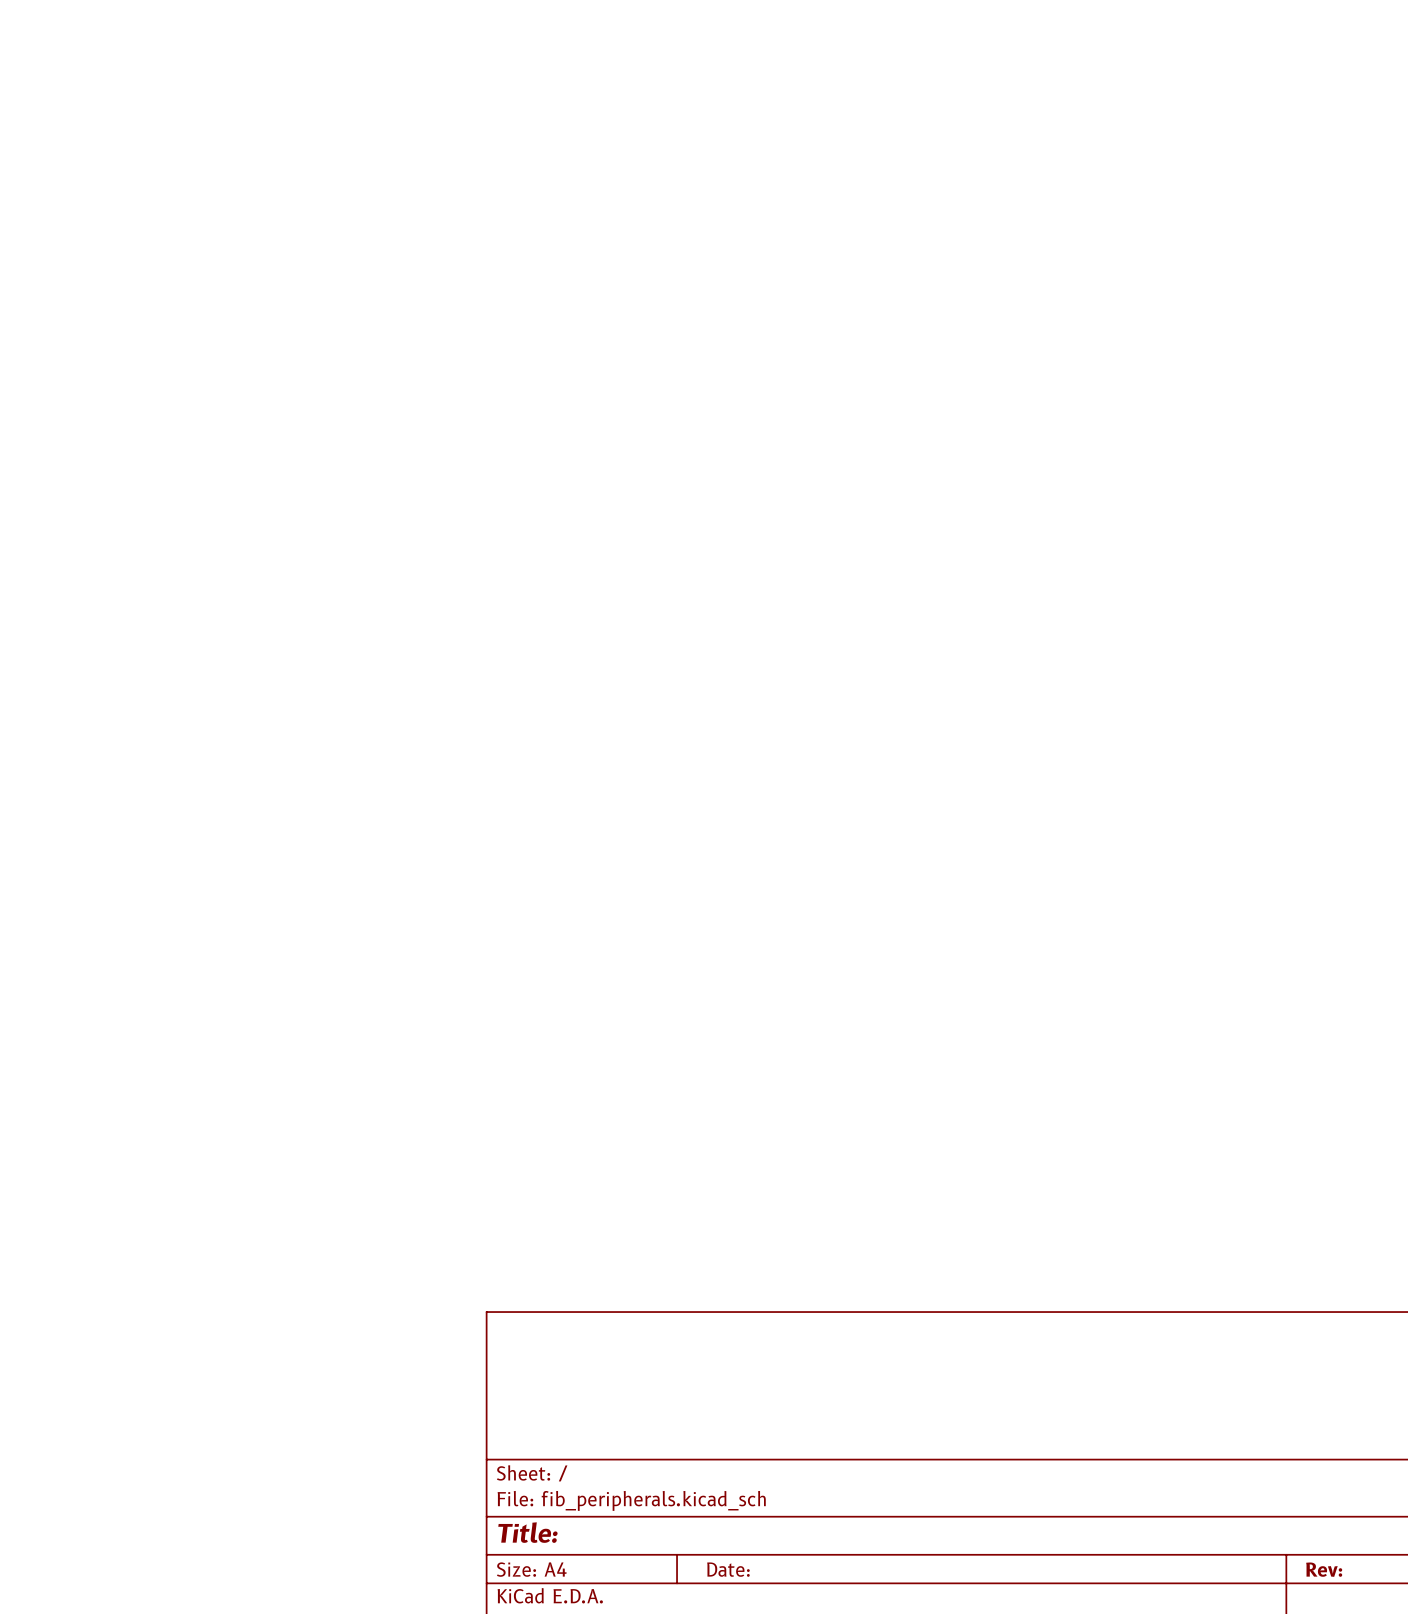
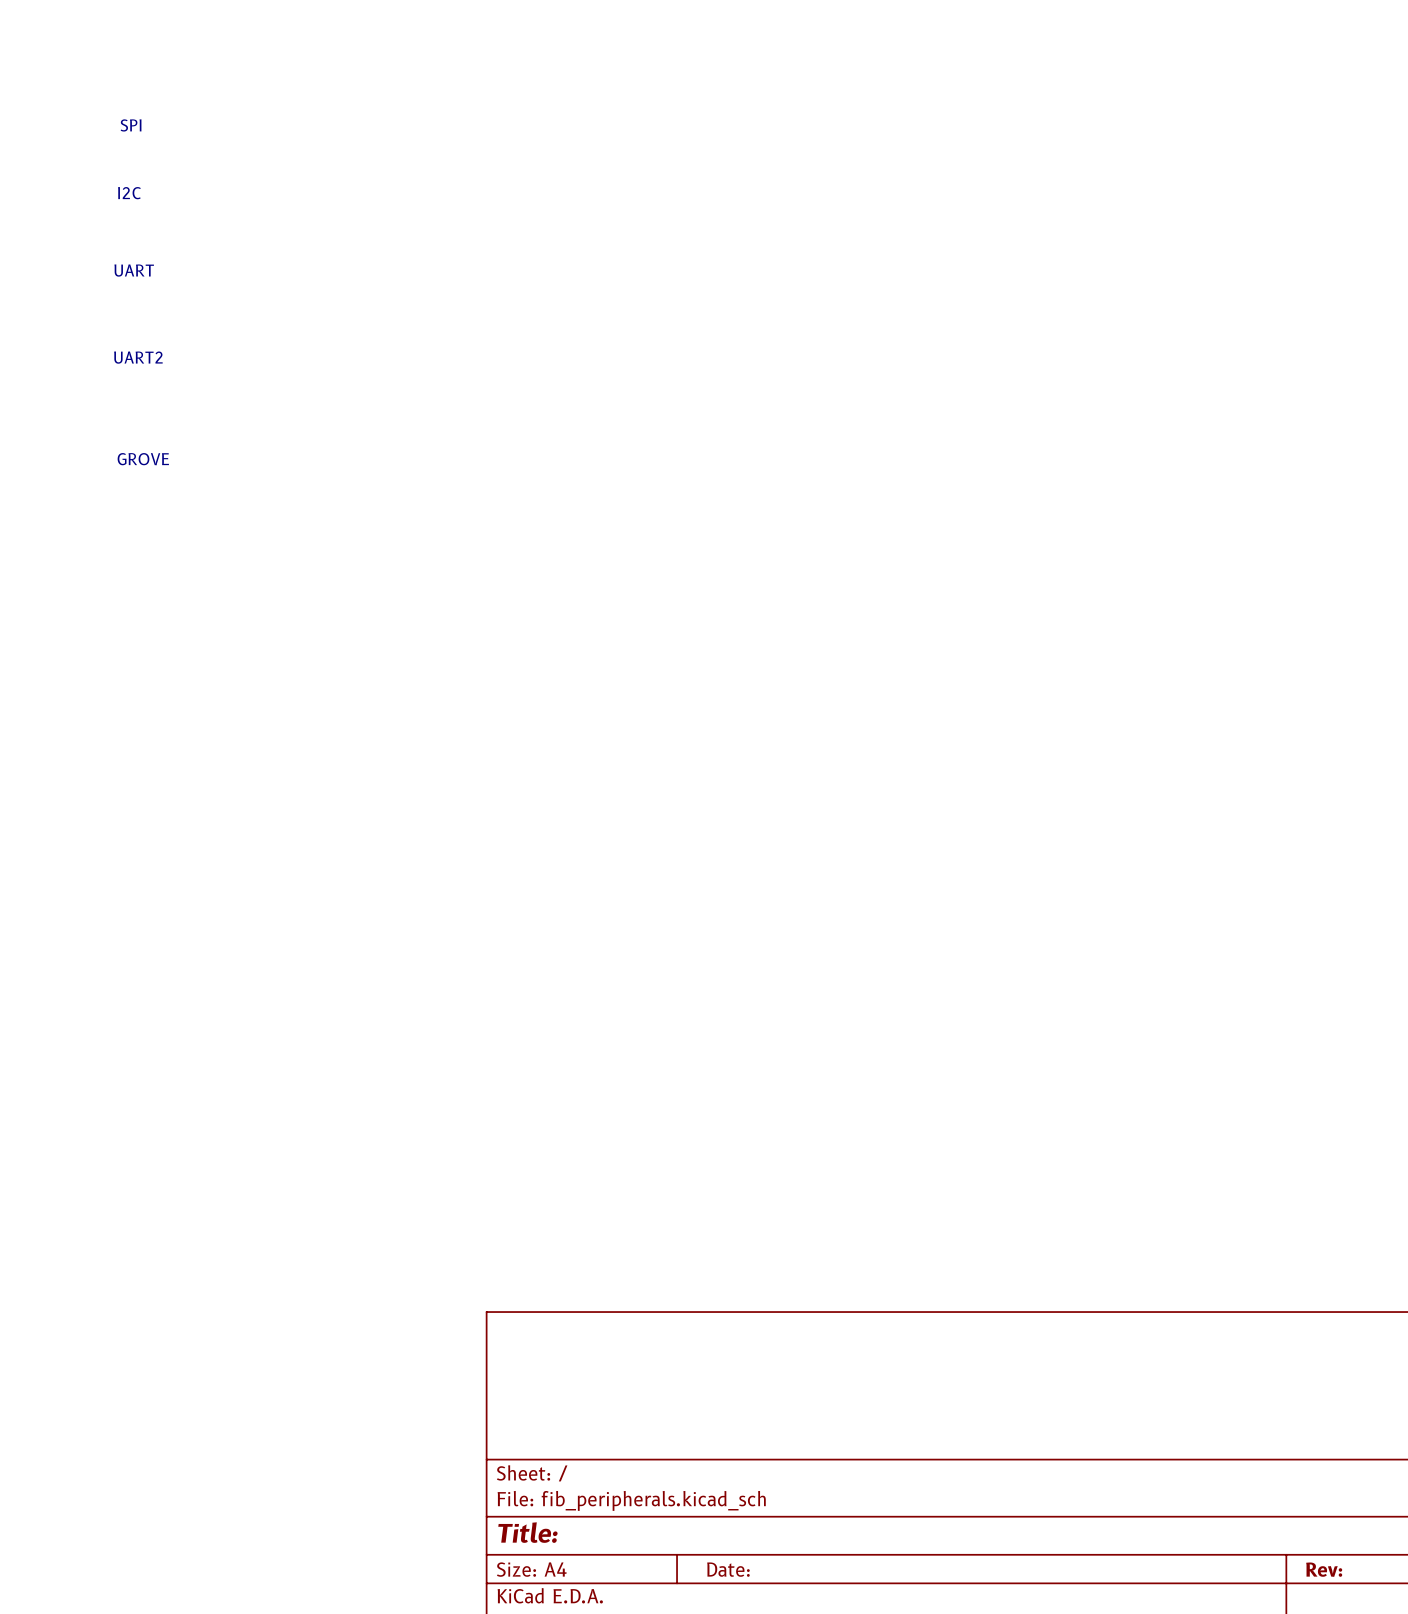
text: none -> SPI (131, 125)
text: none -> I2C (129, 193)
text: none -> UART (134, 270)
text: none -> UART2 (138, 357)
text: none -> GROVE (143, 459)

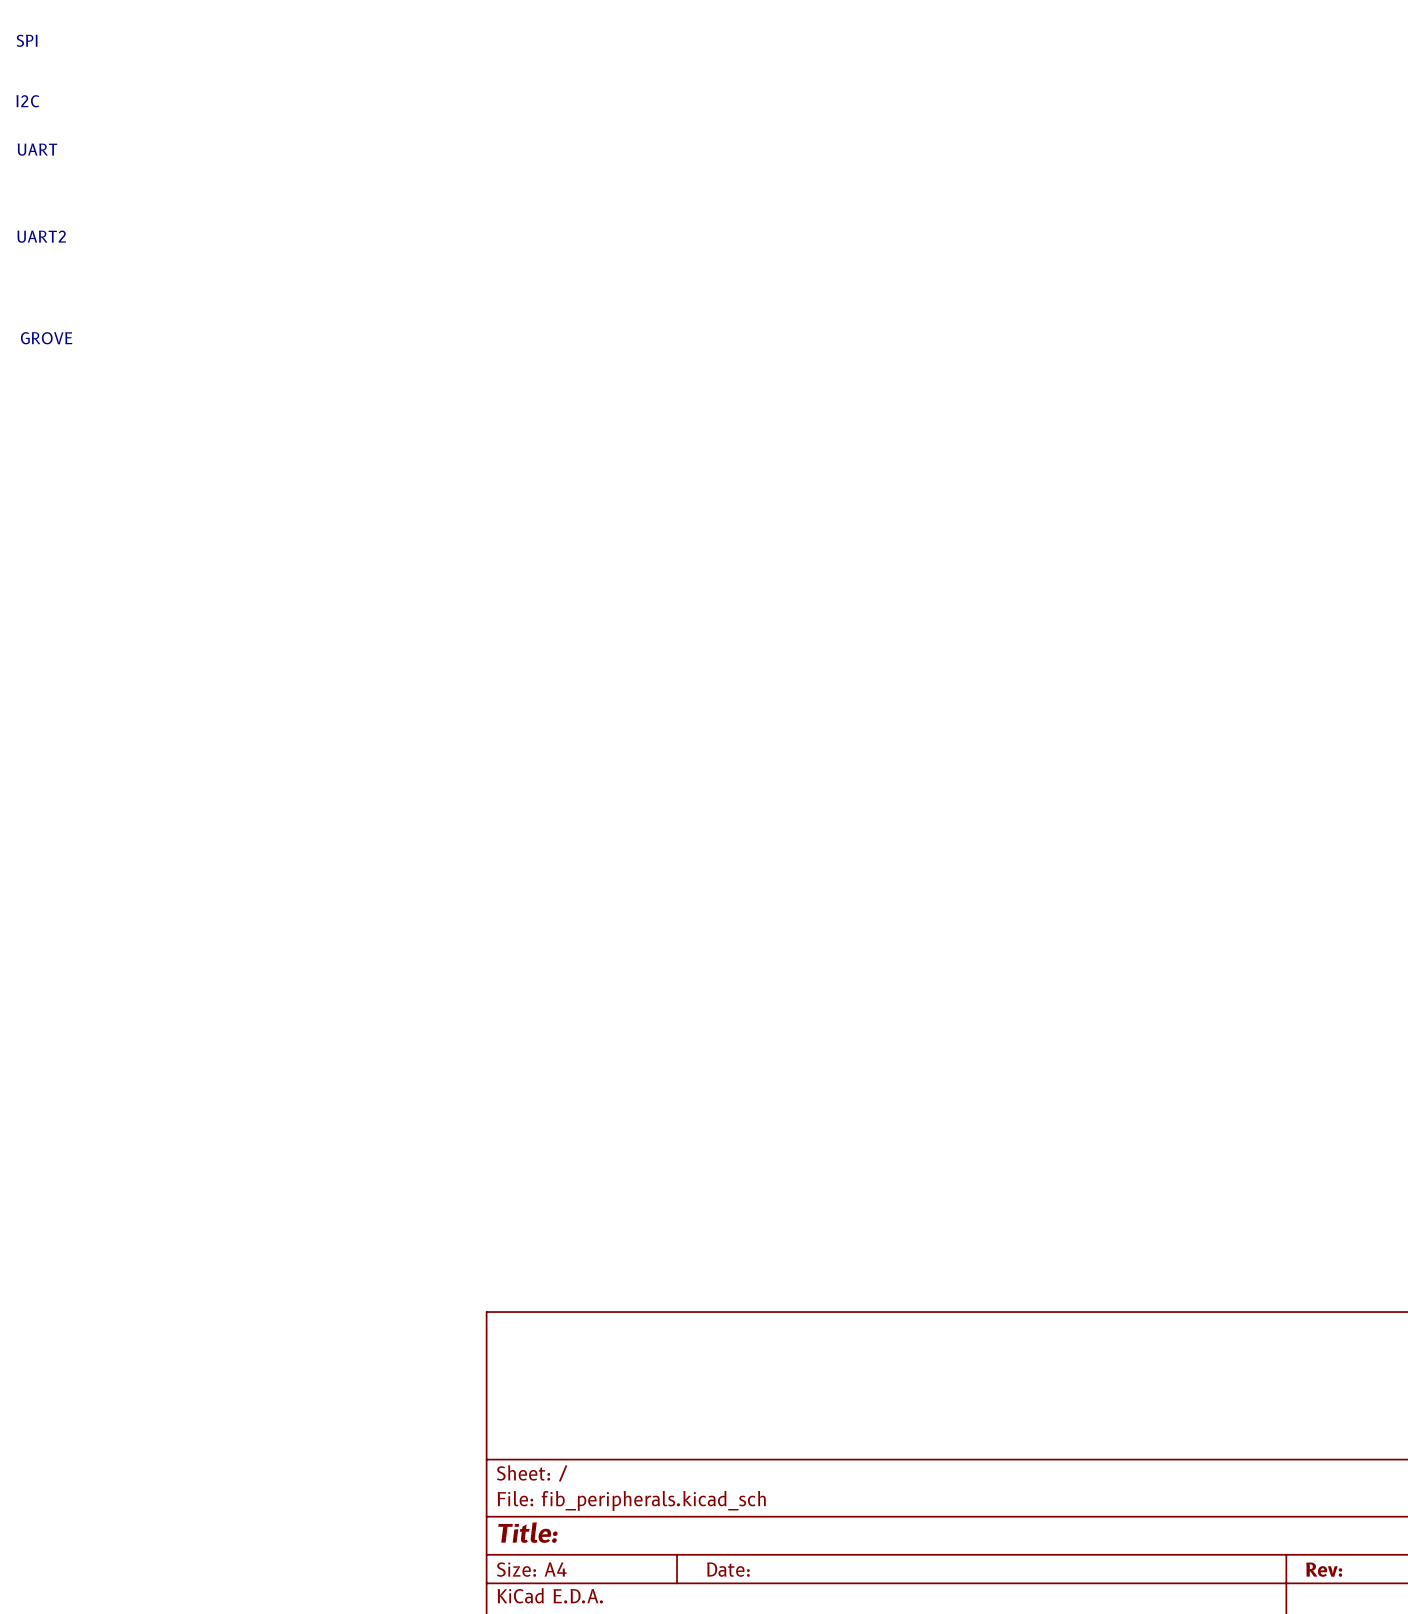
text position: SPI (131, 125) -> SPI (27, 40)
text position: I2C (129, 193) -> I2C (27, 101)
text position: UART (134, 270) -> UART (37, 149)
text position: UART2 (138, 357) -> UART2 (41, 236)
text position: GROVE (143, 459) -> GROVE (46, 338)

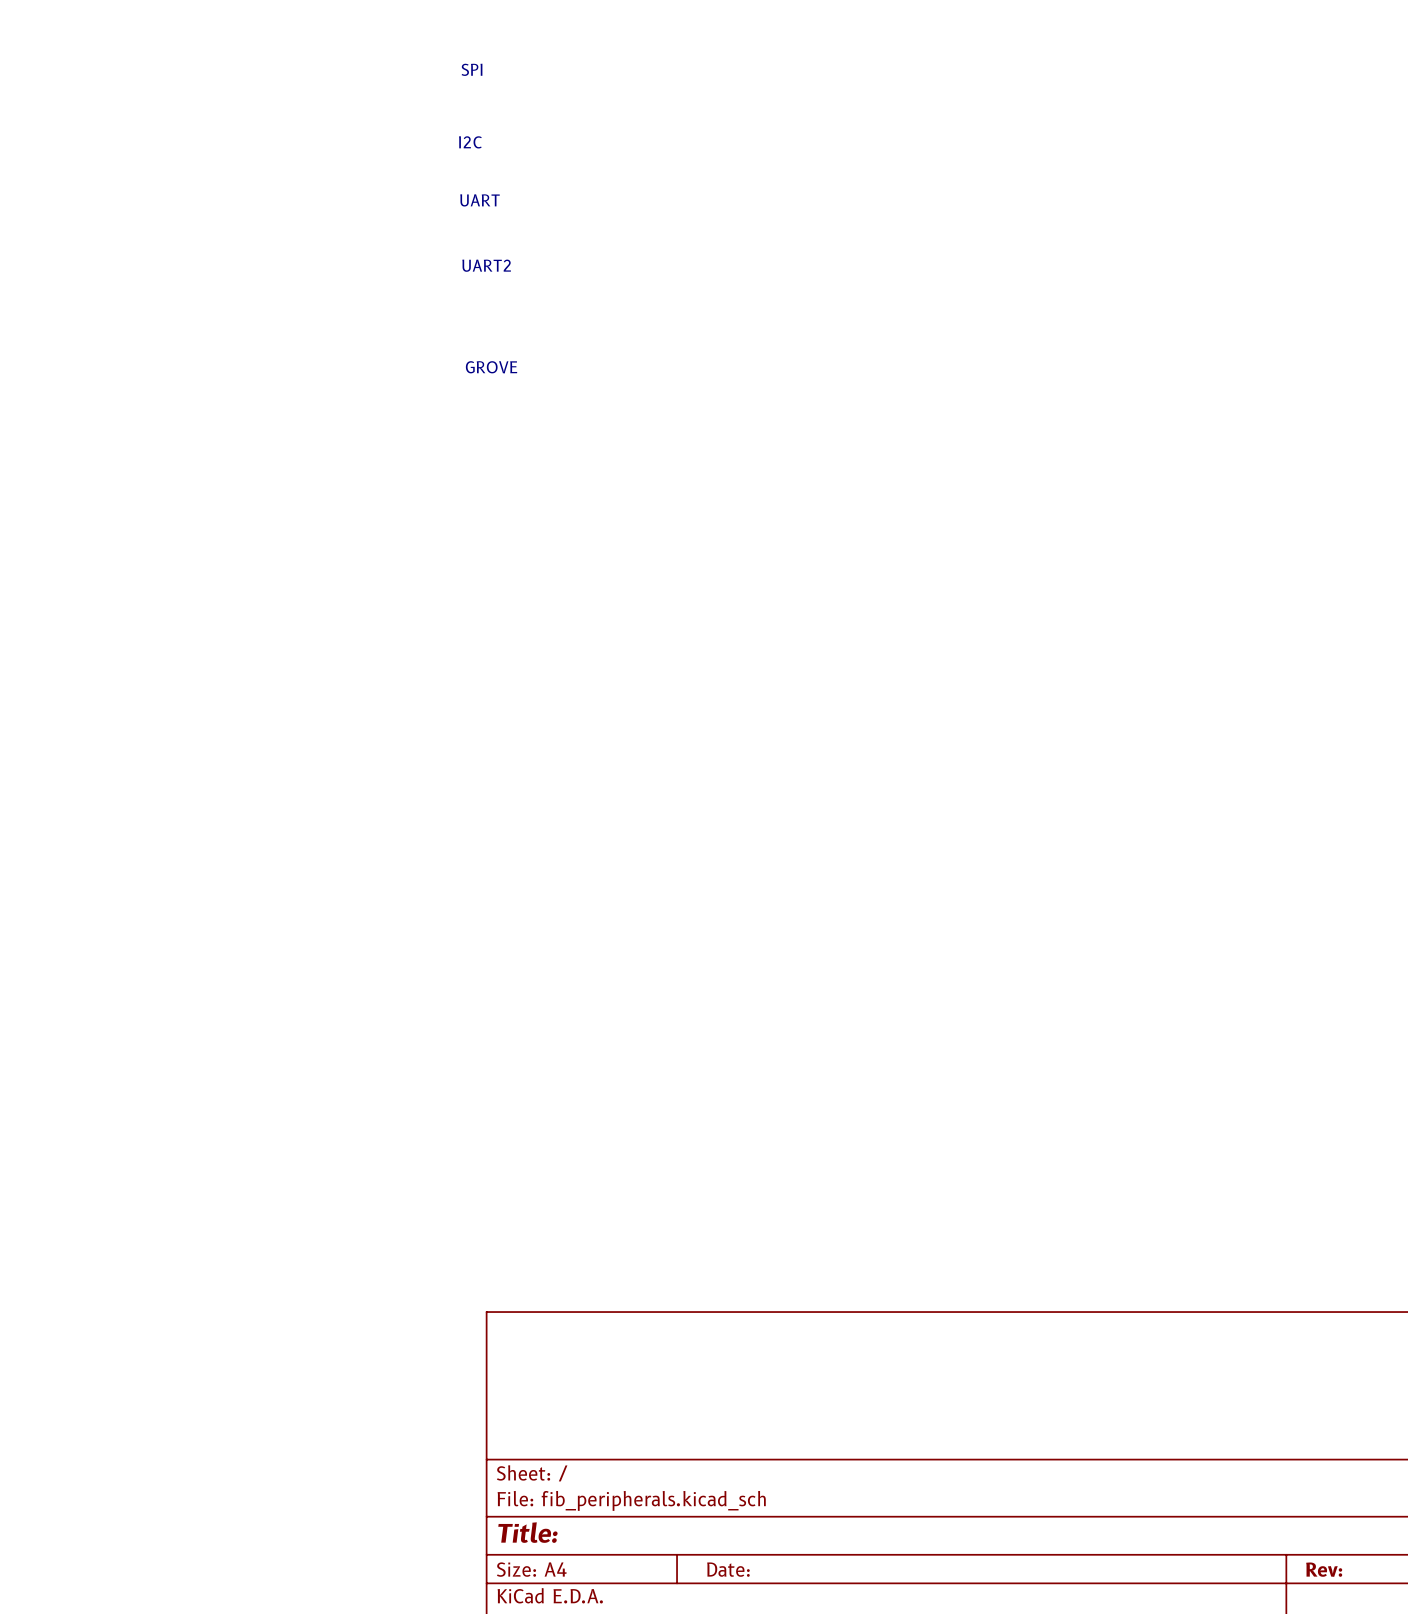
text: SPI (27, 40) -> none
text: none -> SPI (472, 69)
text: I2C (27, 101) -> none
text: none -> I2C (470, 142)
text: UART (37, 149) -> none
text: none -> UART (479, 200)
text: UART2 (41, 236) -> none
text: none -> UART2 (486, 265)
text: GROVE (46, 338) -> none
text: none -> GROVE (491, 367)

